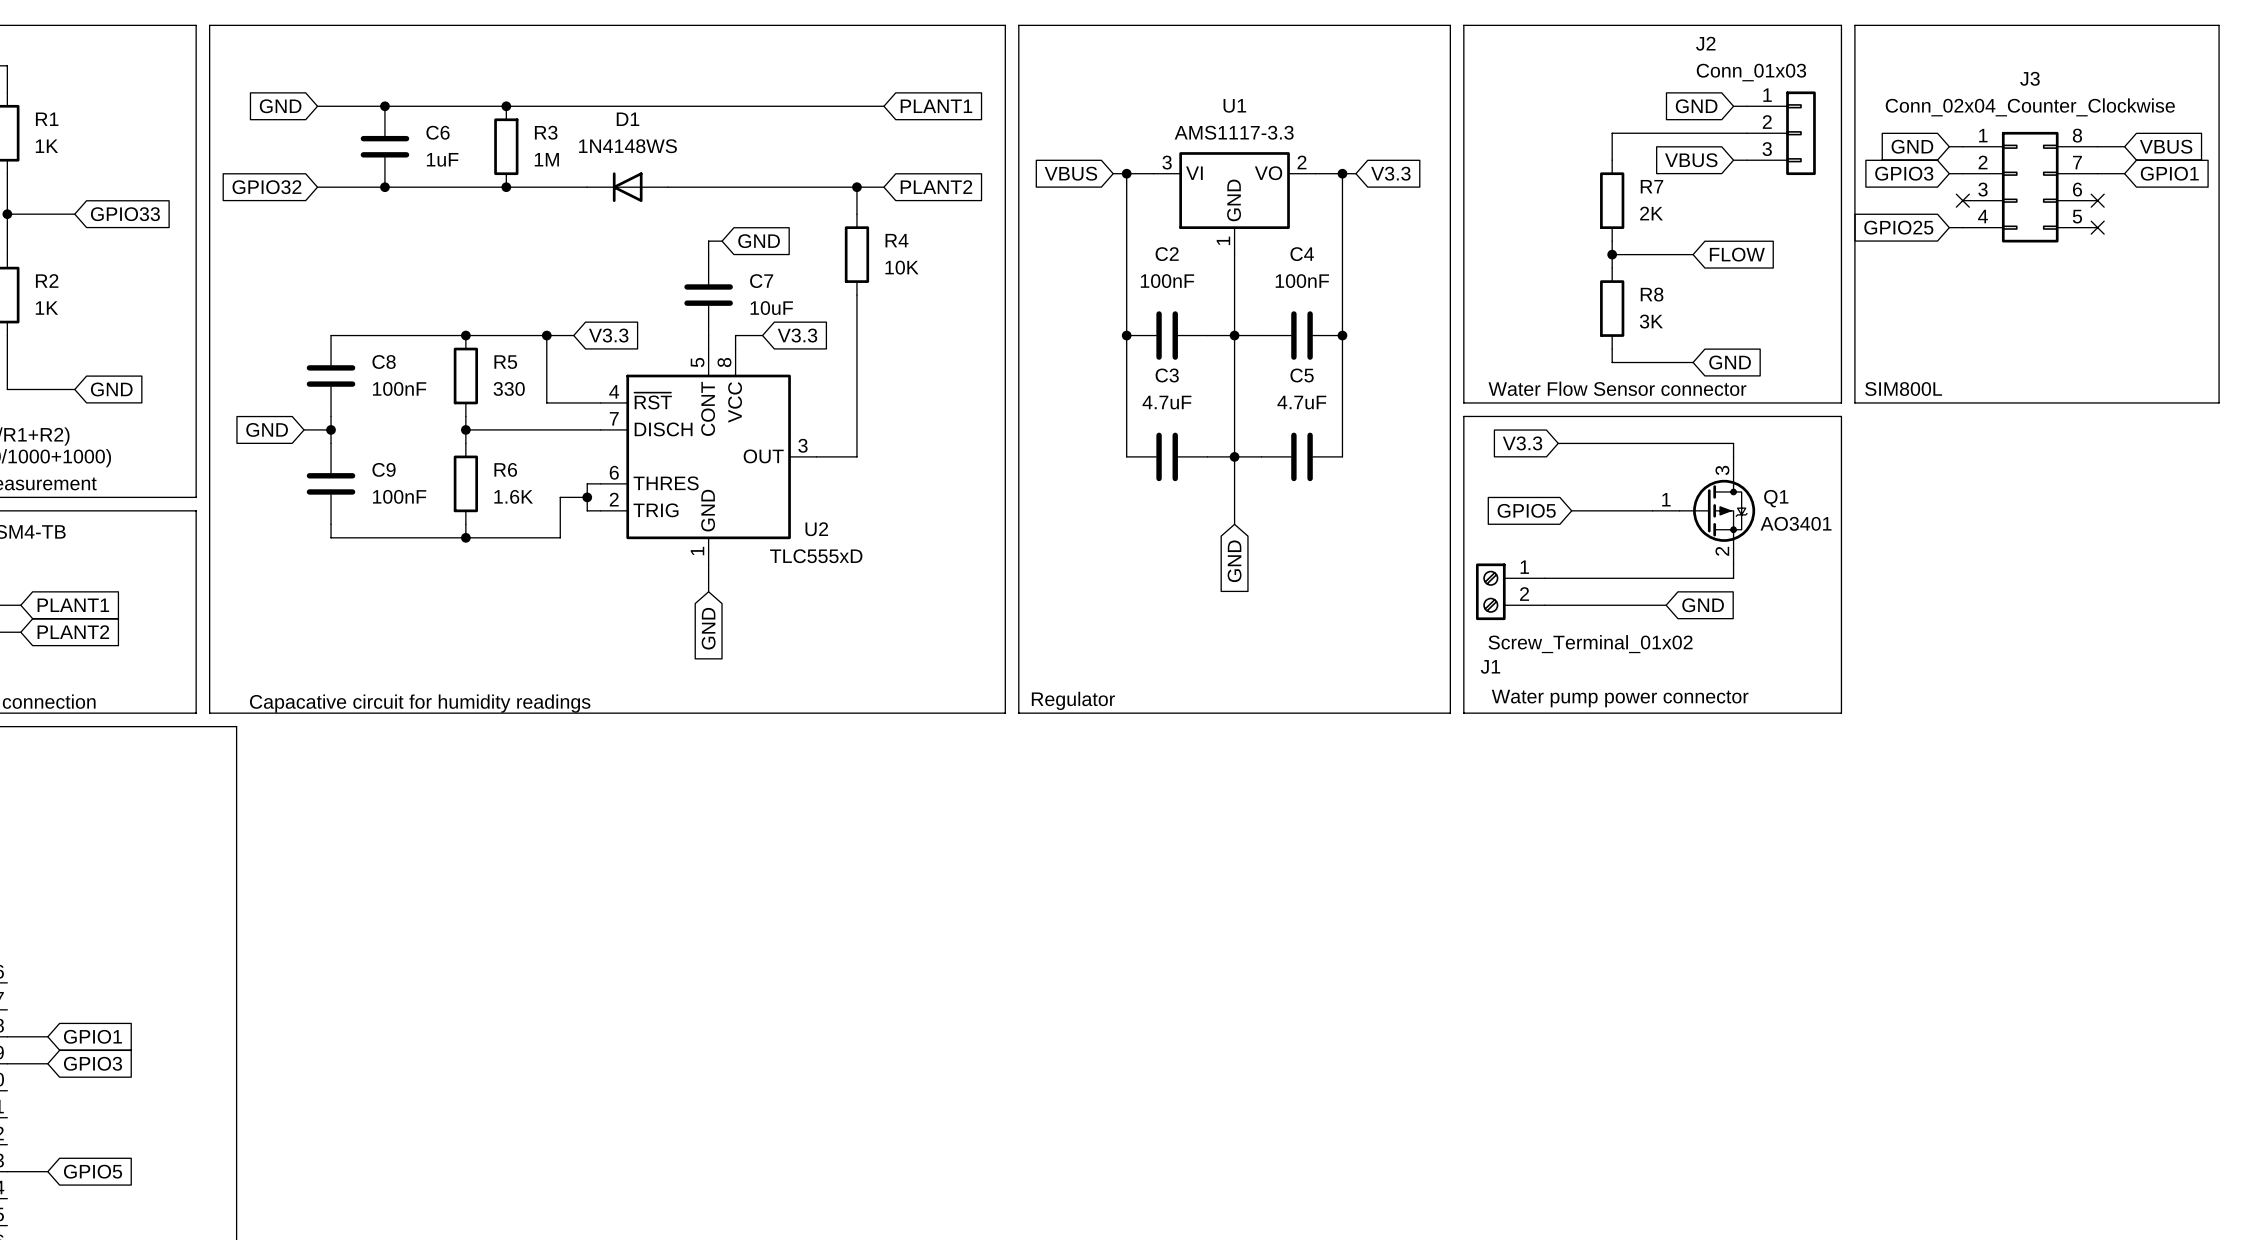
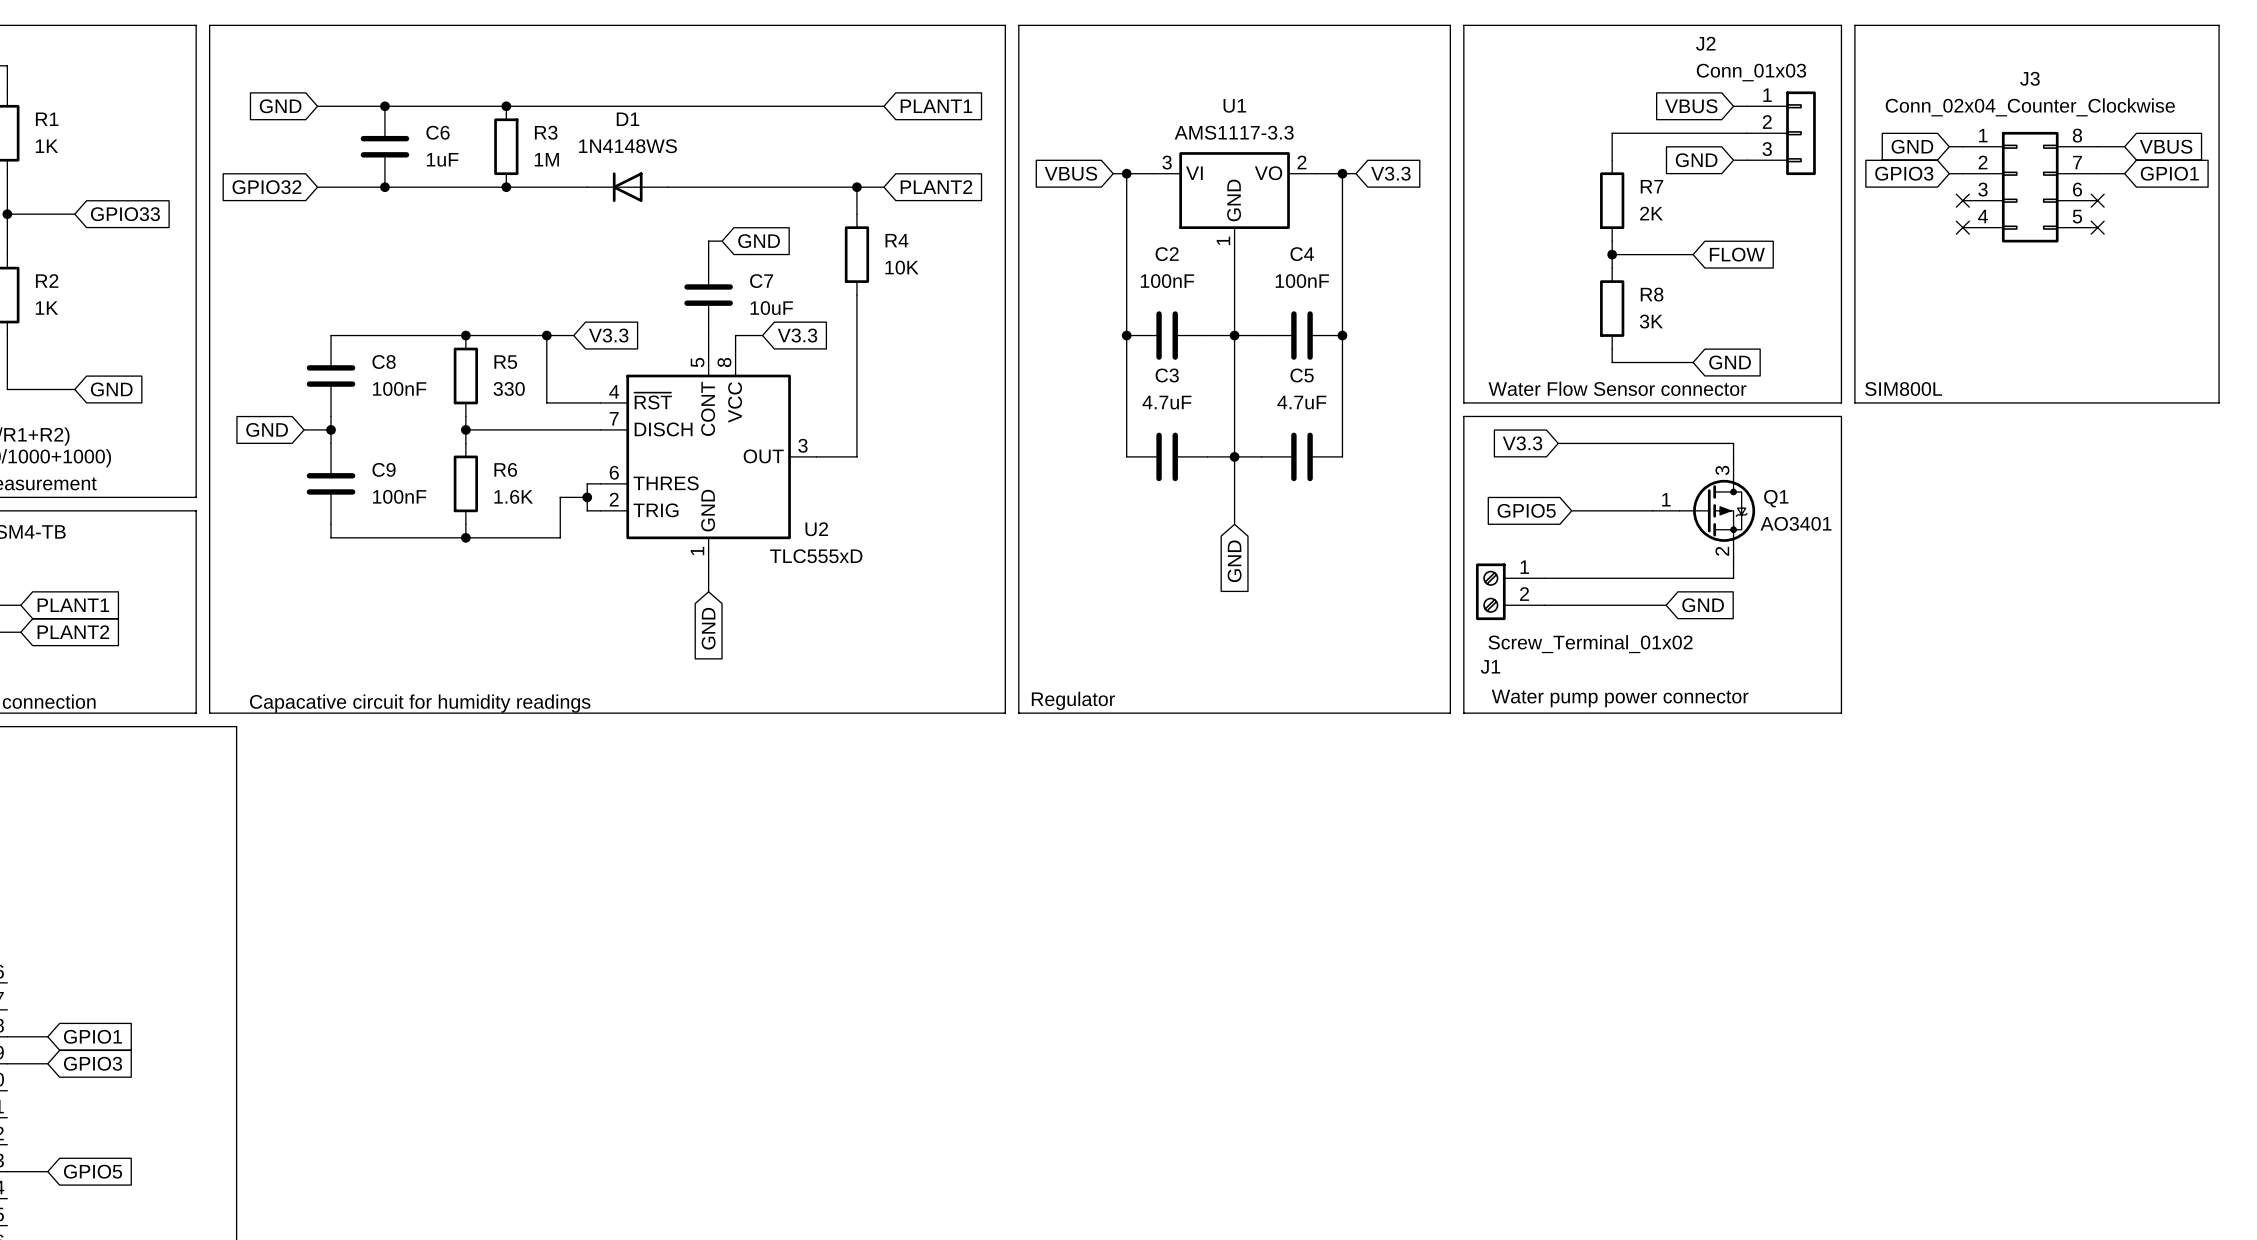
global label: GND (1696, 106) -> VBUS (1691, 106)
global label: VBUS (1691, 160) -> GND (1696, 160)
global label: GPIO25 (1898, 227) -> none
wire: (1949, 227) (1962, 227) -> none
no-connect mark: none -> (1962, 227)

